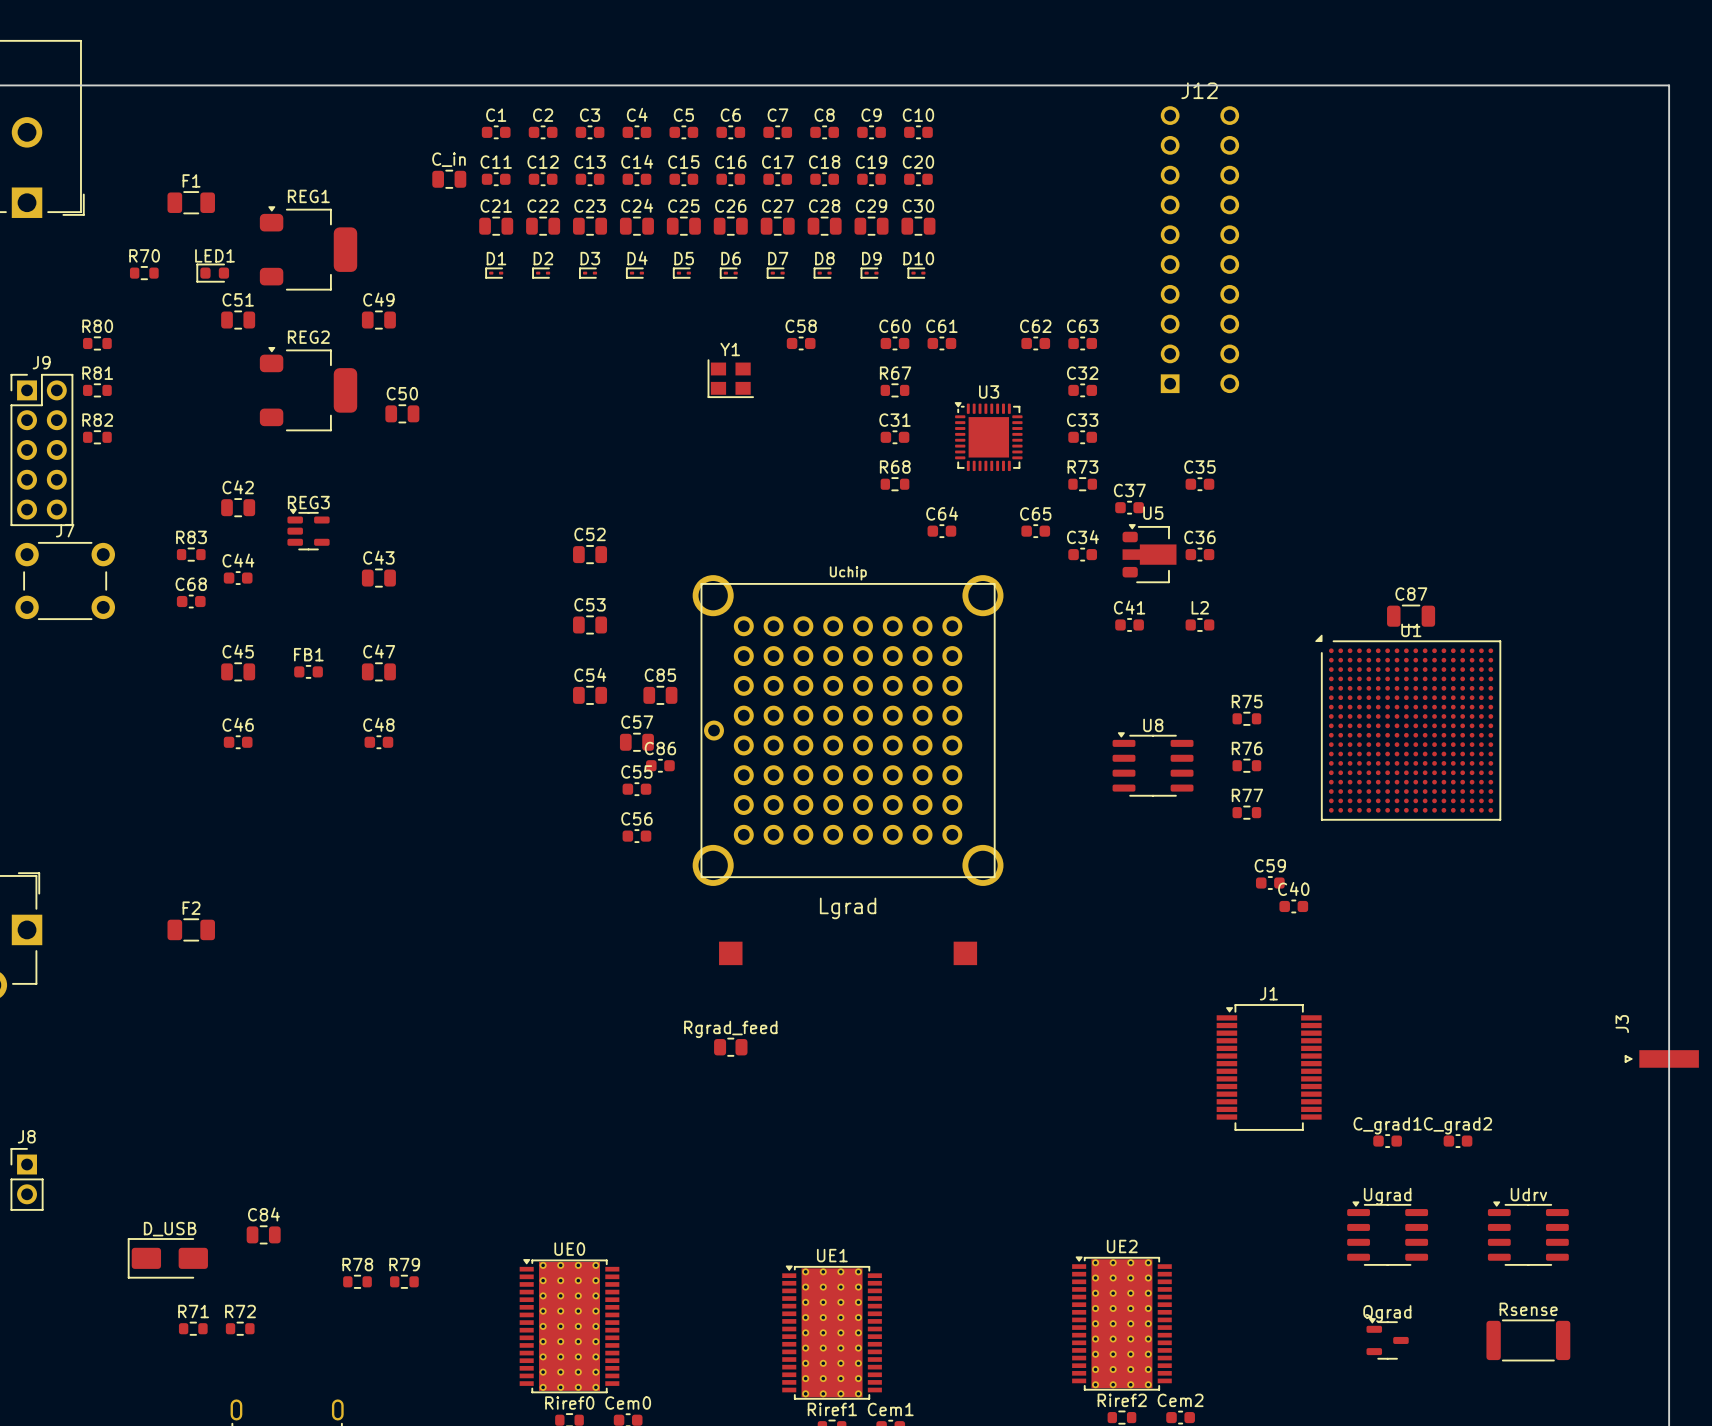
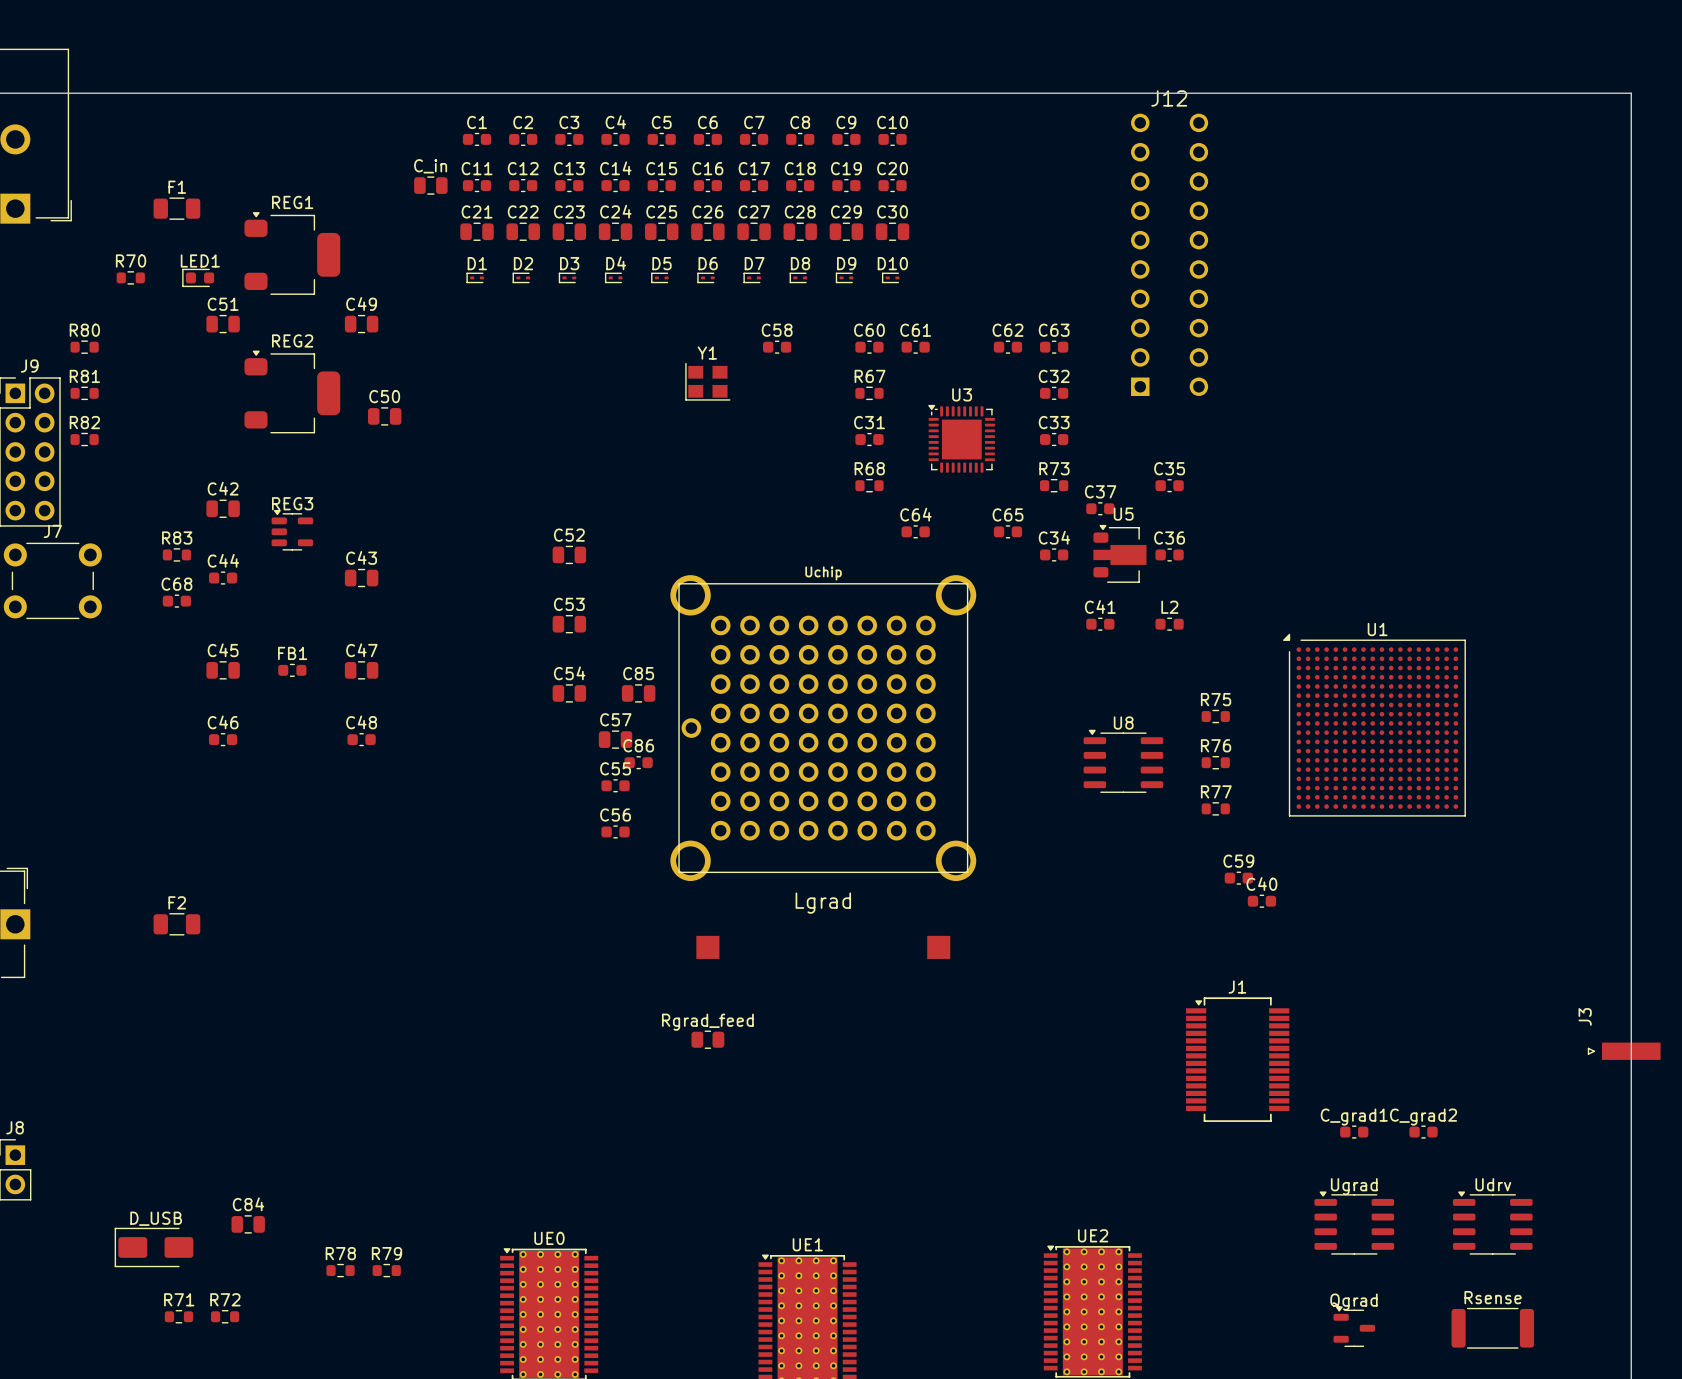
C87: (1411, 616) -> none

